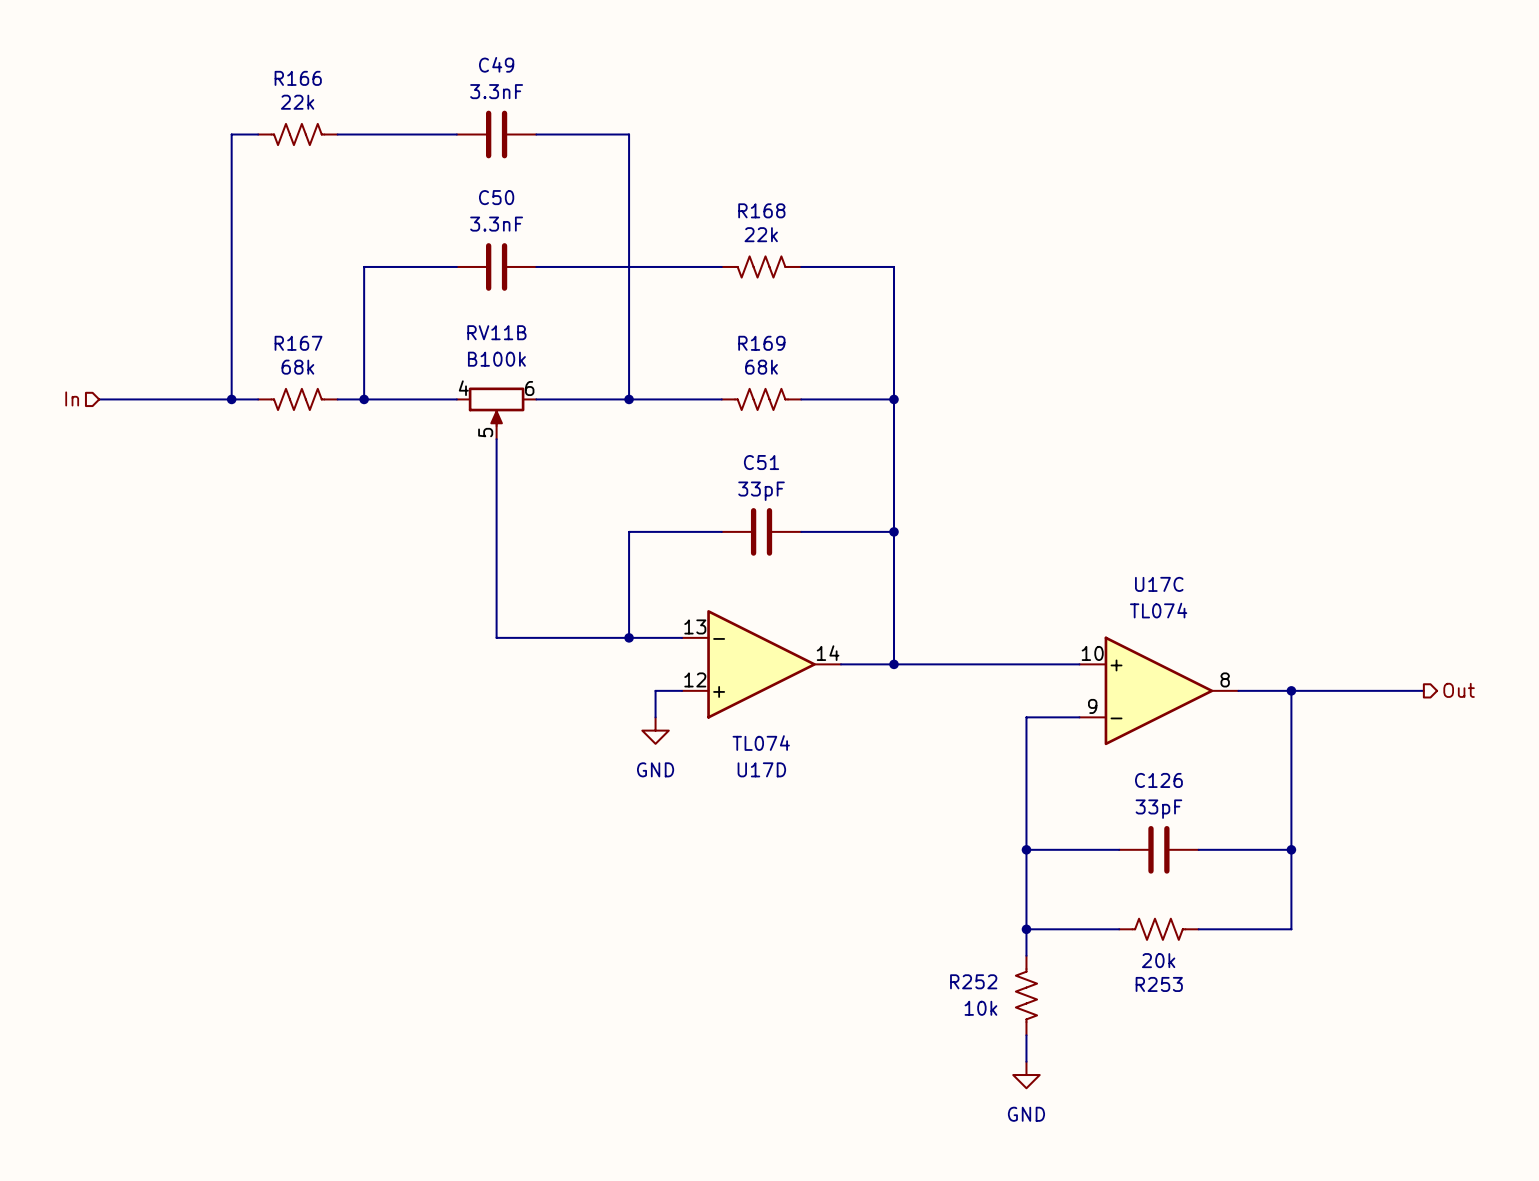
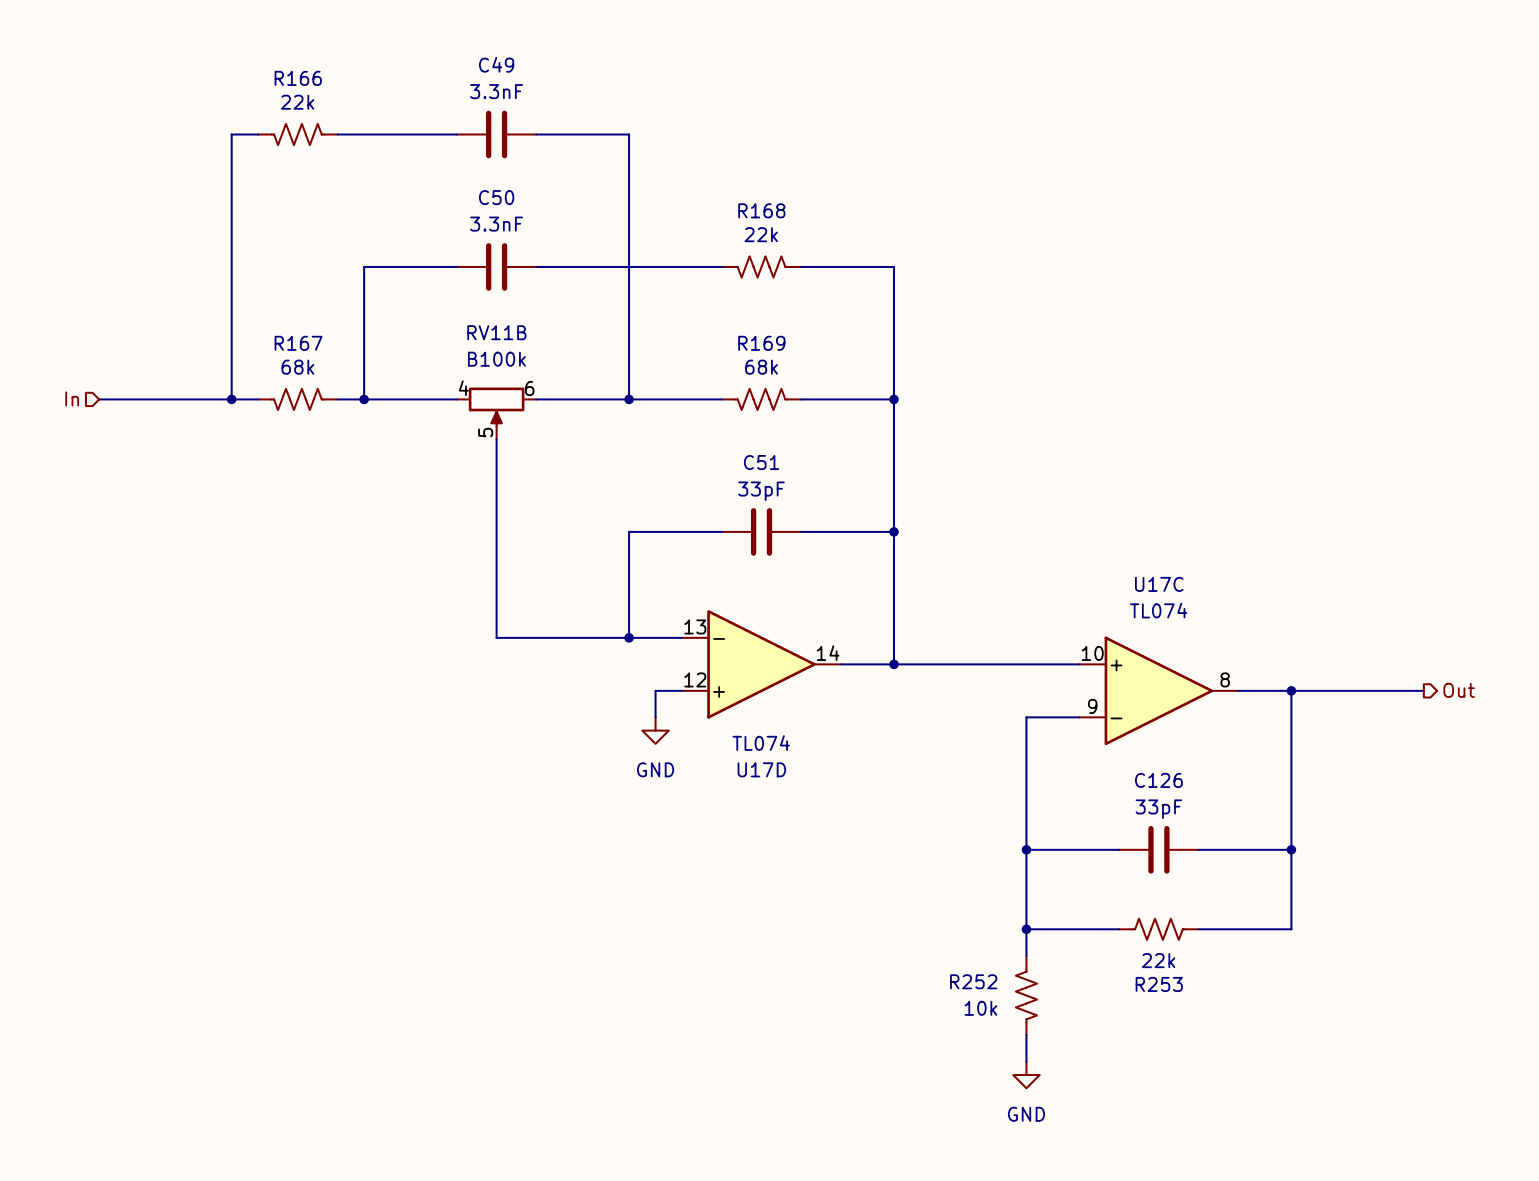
R253 value: 20k (1158, 960) -> 22k (1158, 960)

